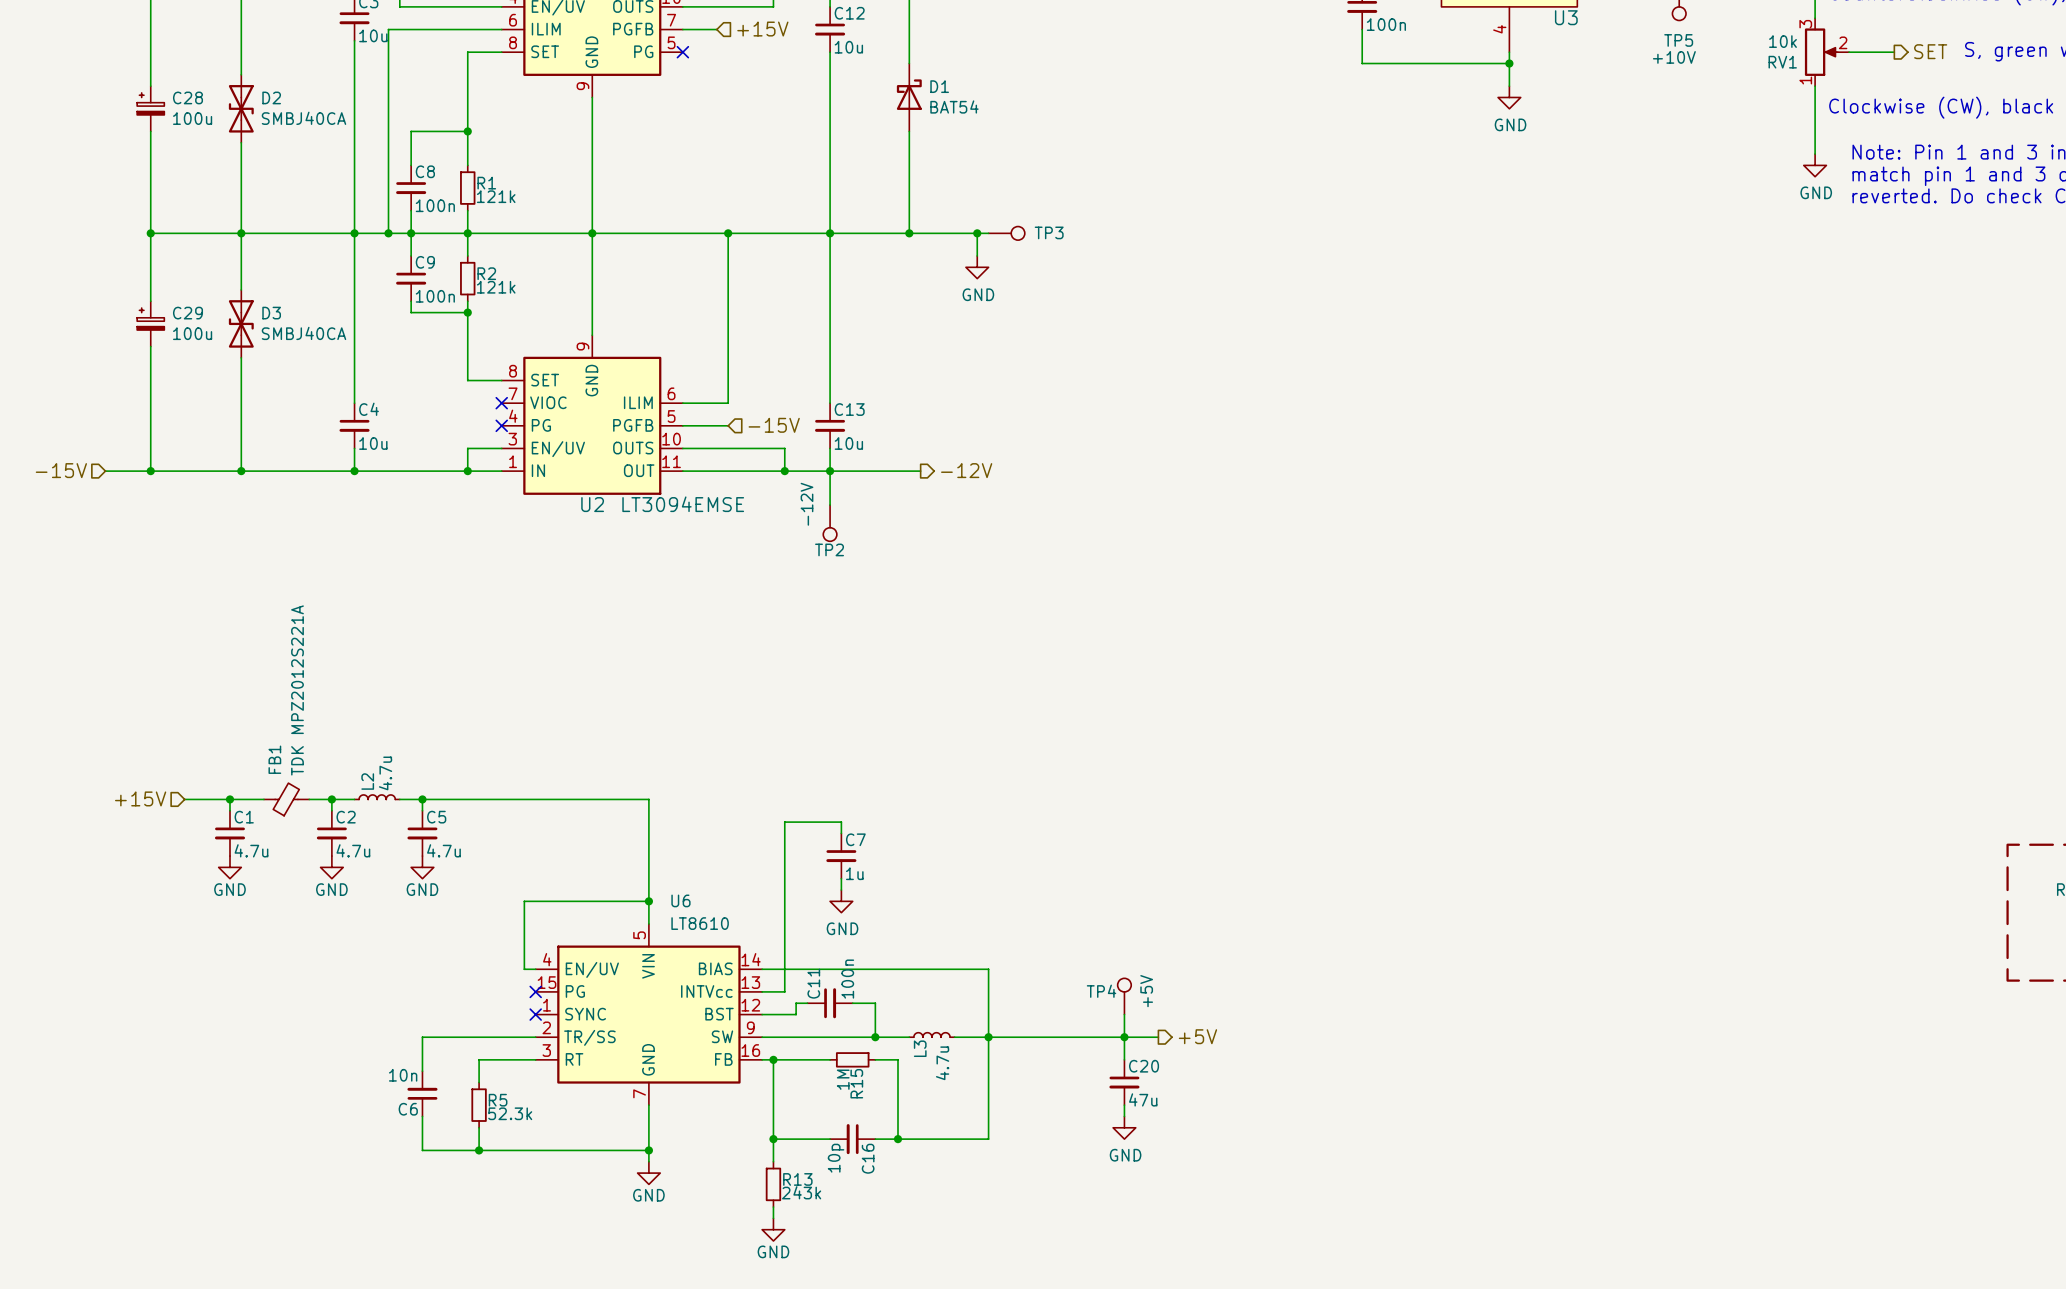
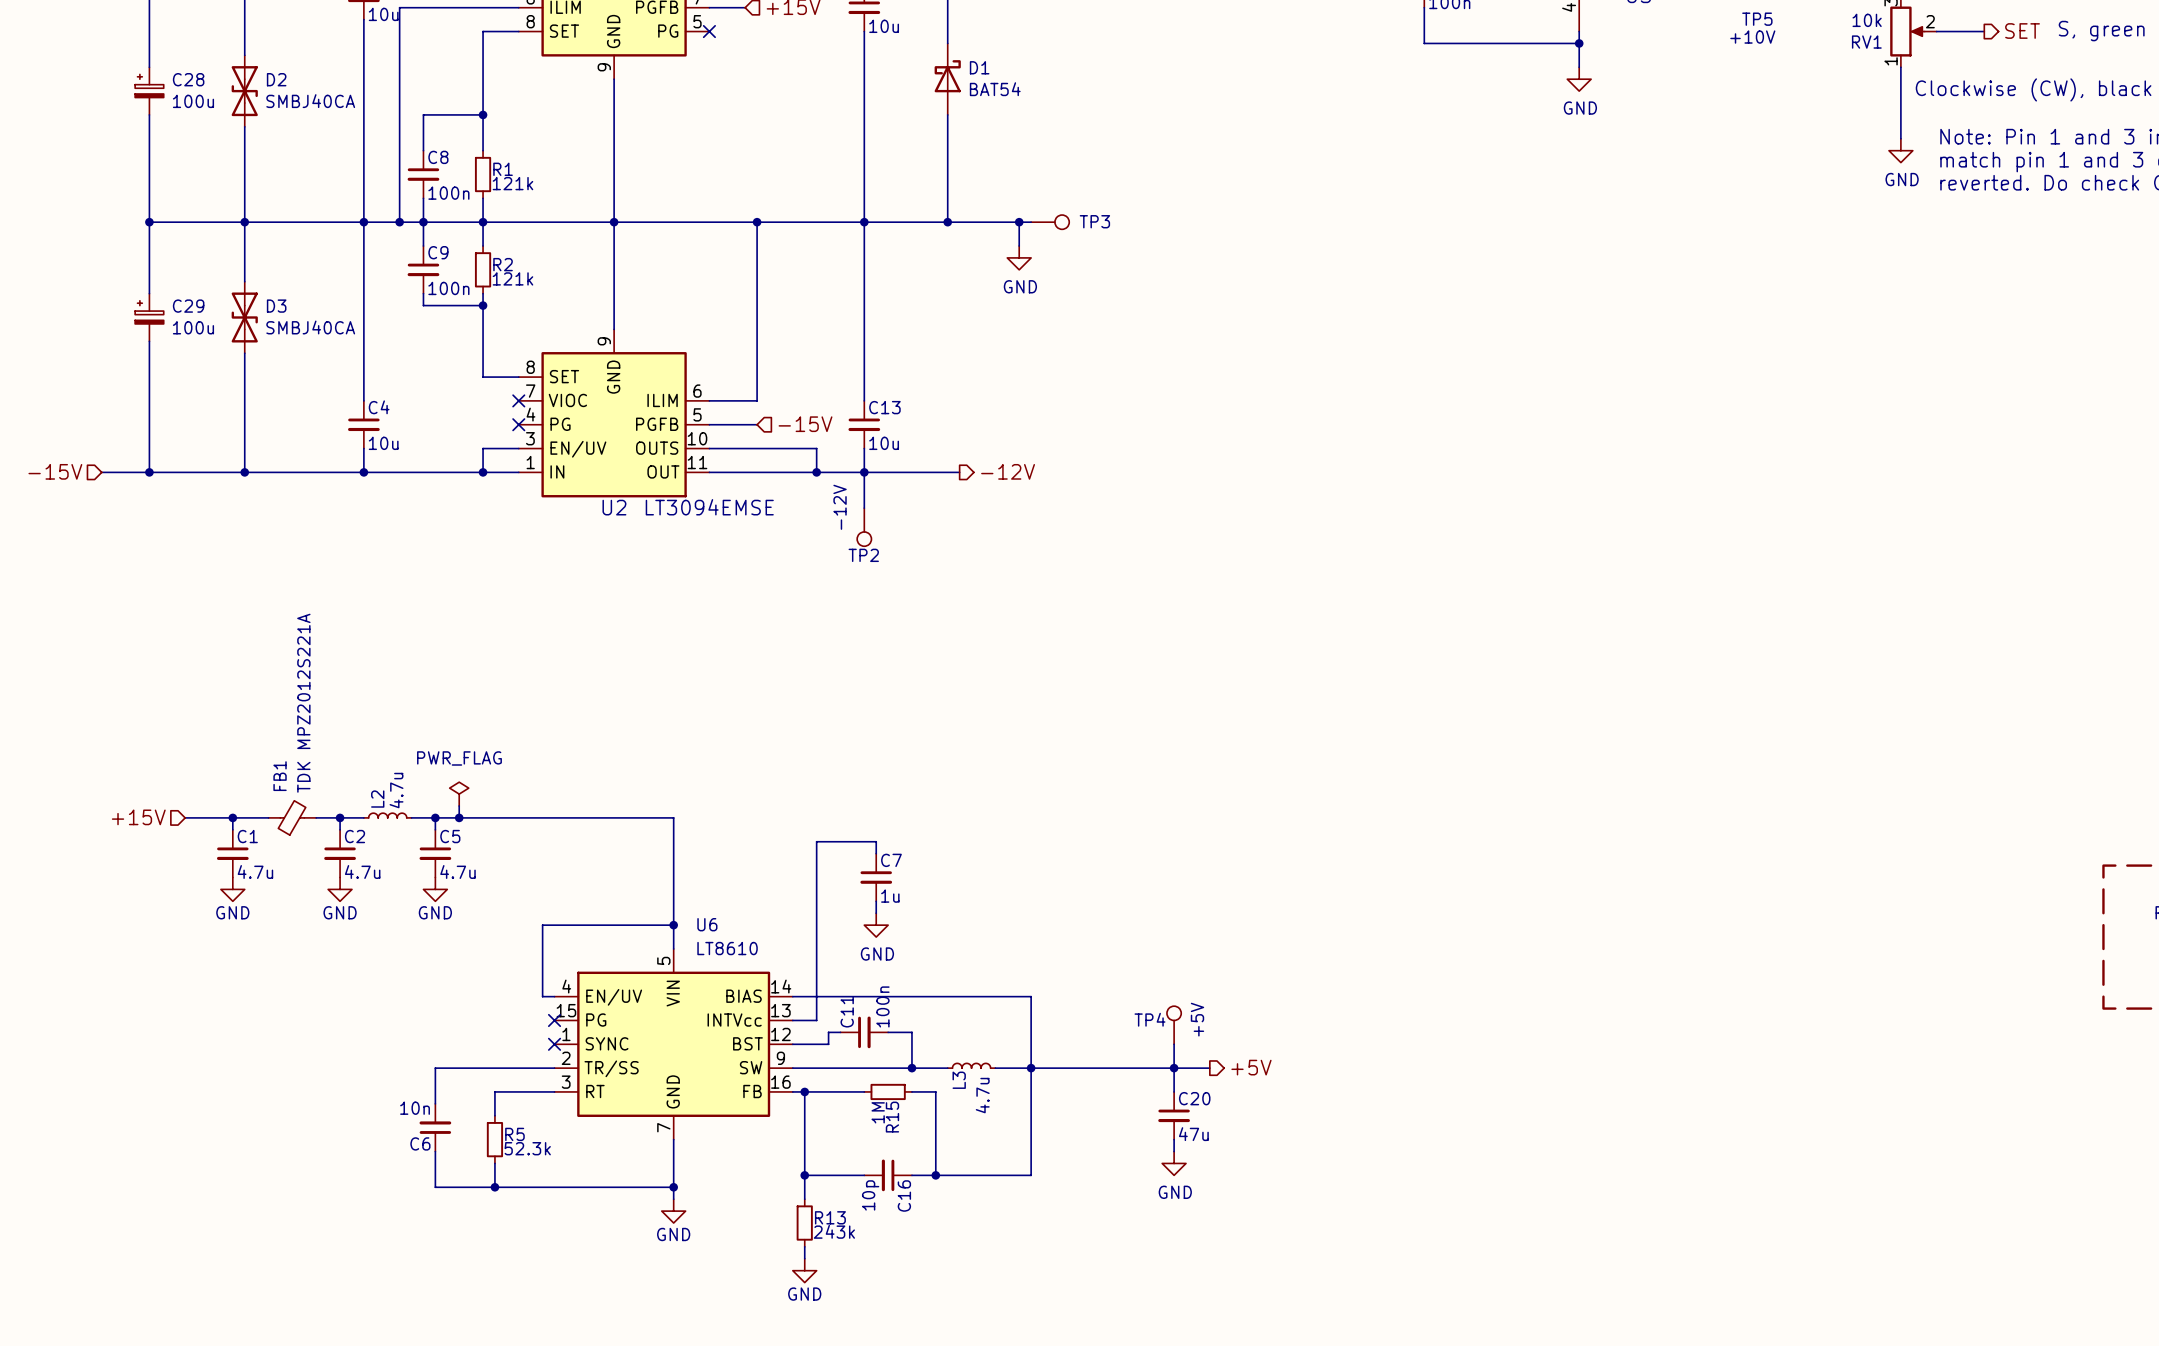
power symbol: none -> PWR_FLAG (459, 794)
wire: none -> (459, 806) (459, 817)
junction: none -> (459, 817)

